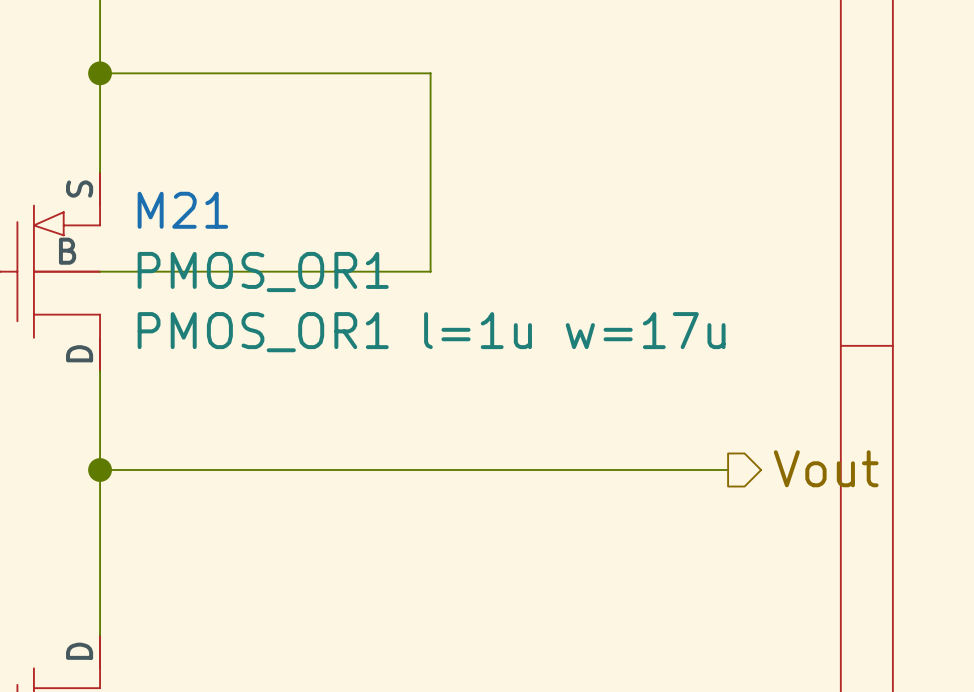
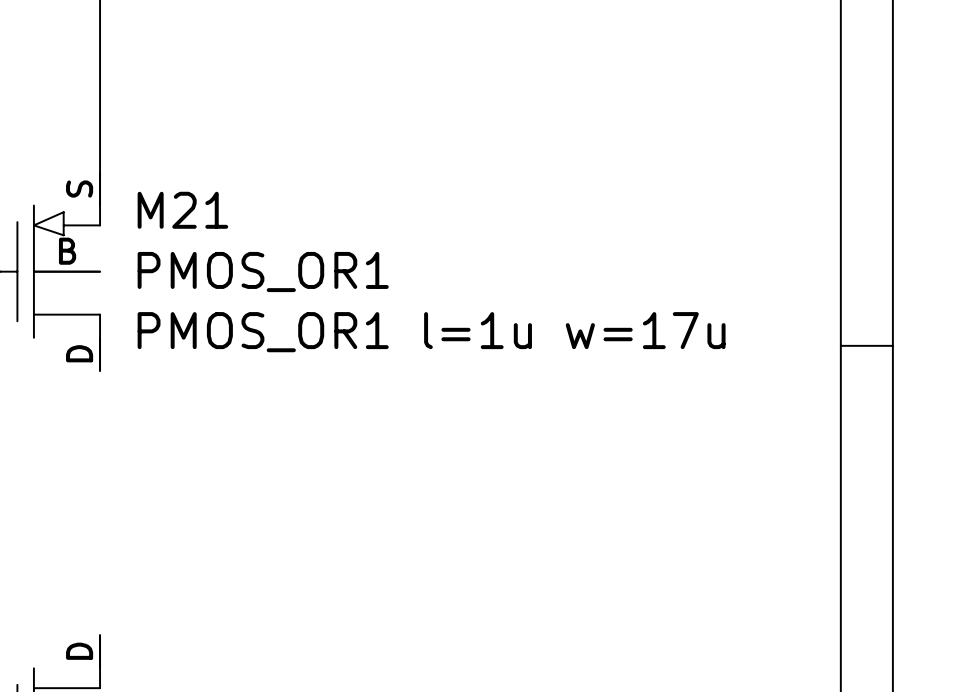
wire: (100, 73) (430, 73) (430, 271) (100, 271) -> none
junction: (100, 73) -> none
wire: (100, 370) (100, 635) -> none
hierarchical label: Vout (826, 468) -> none
wire: (100, 470) (728, 470) -> none
junction: (100, 470) -> none

